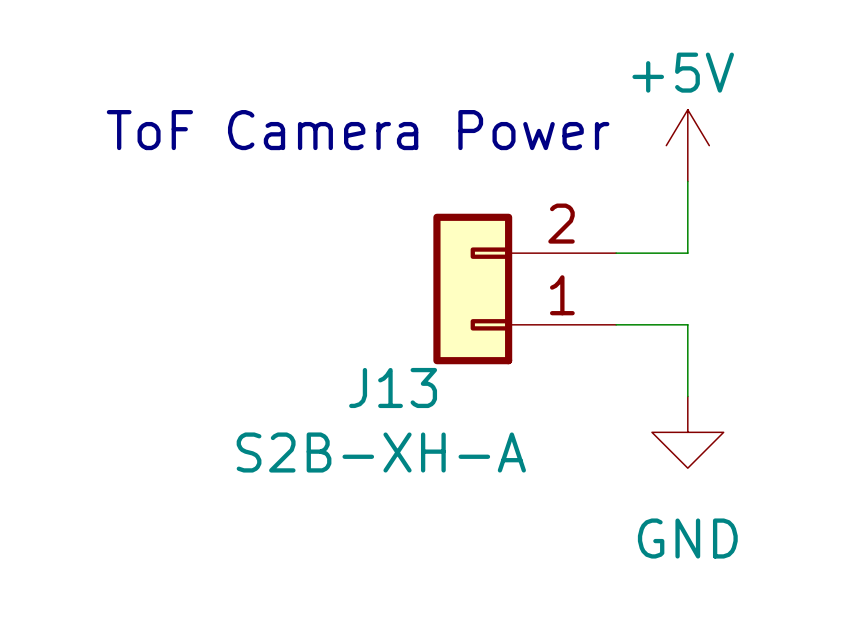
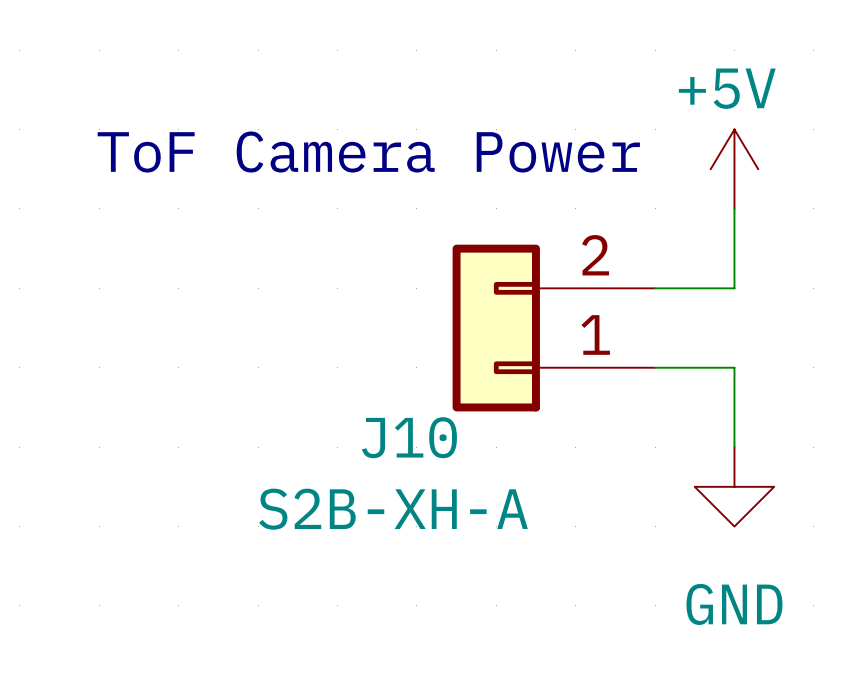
J13 name: J13 (393, 387) -> J10 (409, 437)

